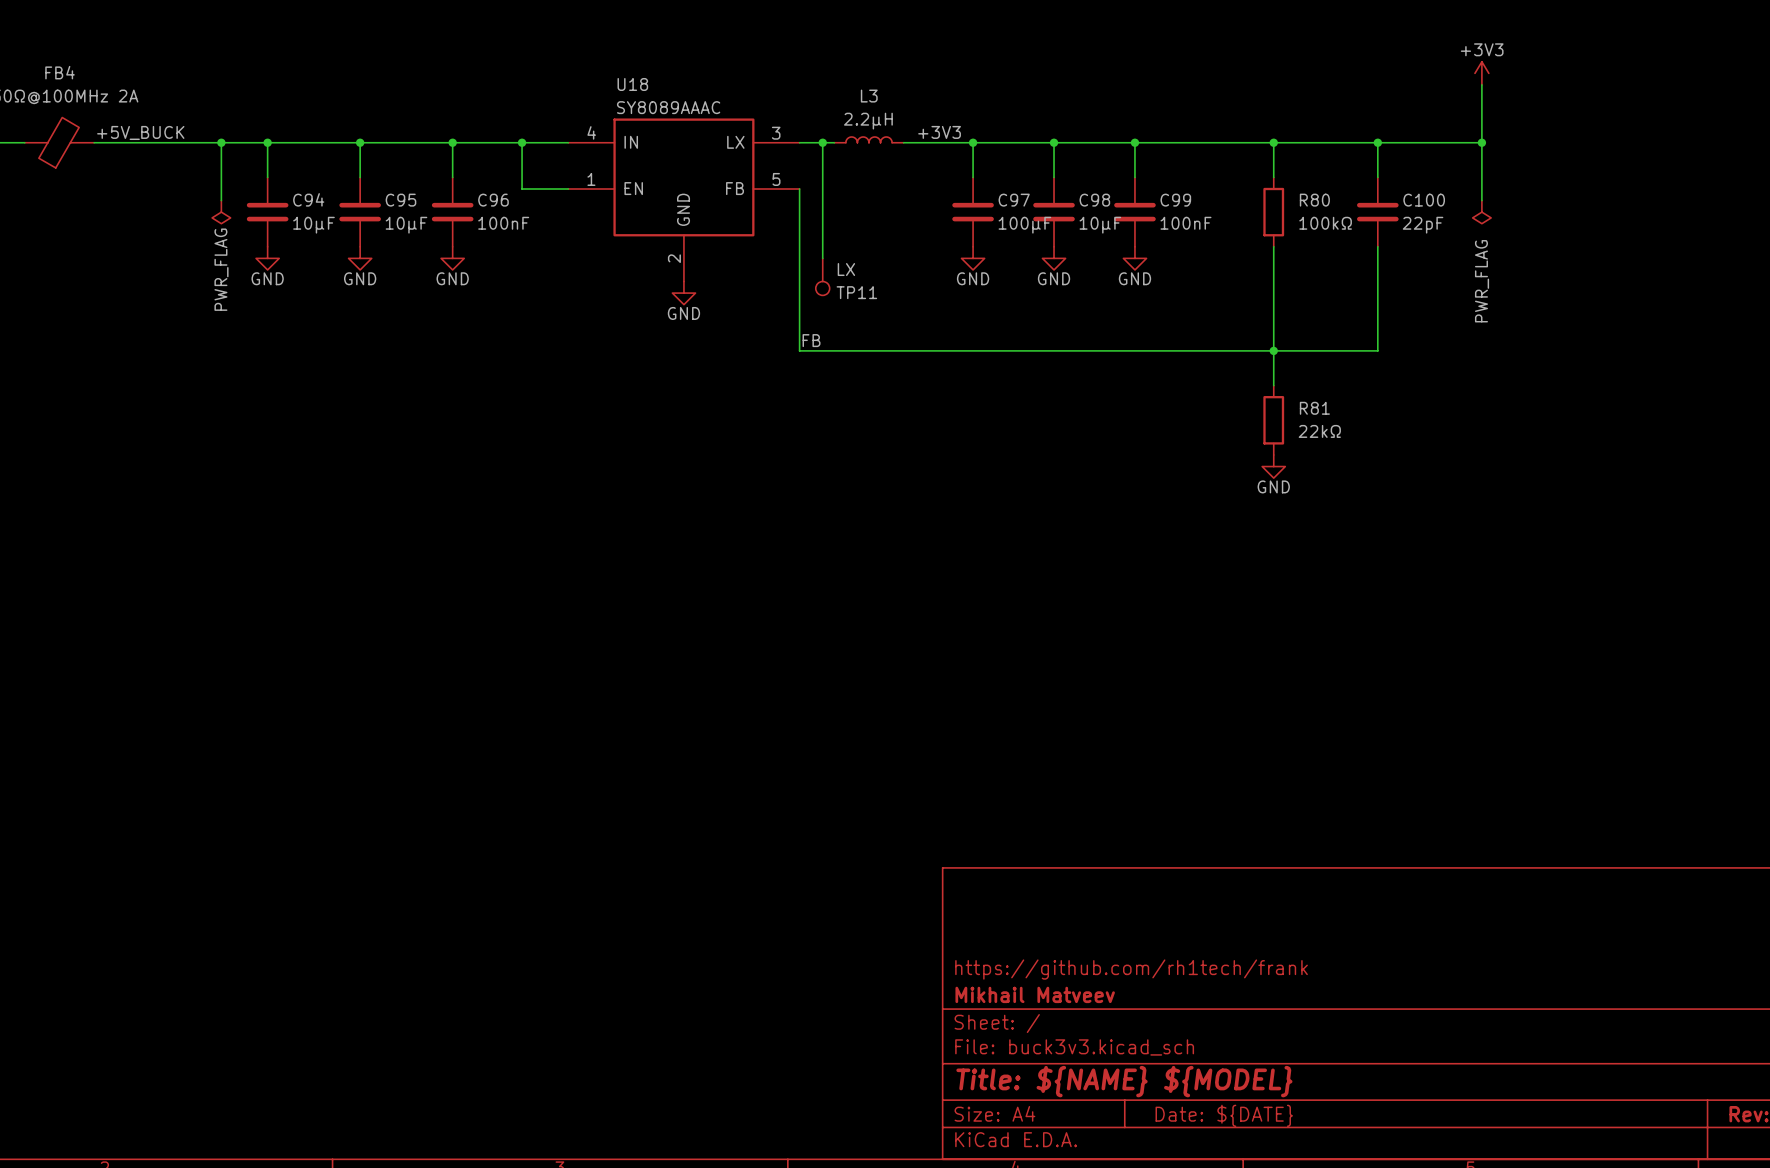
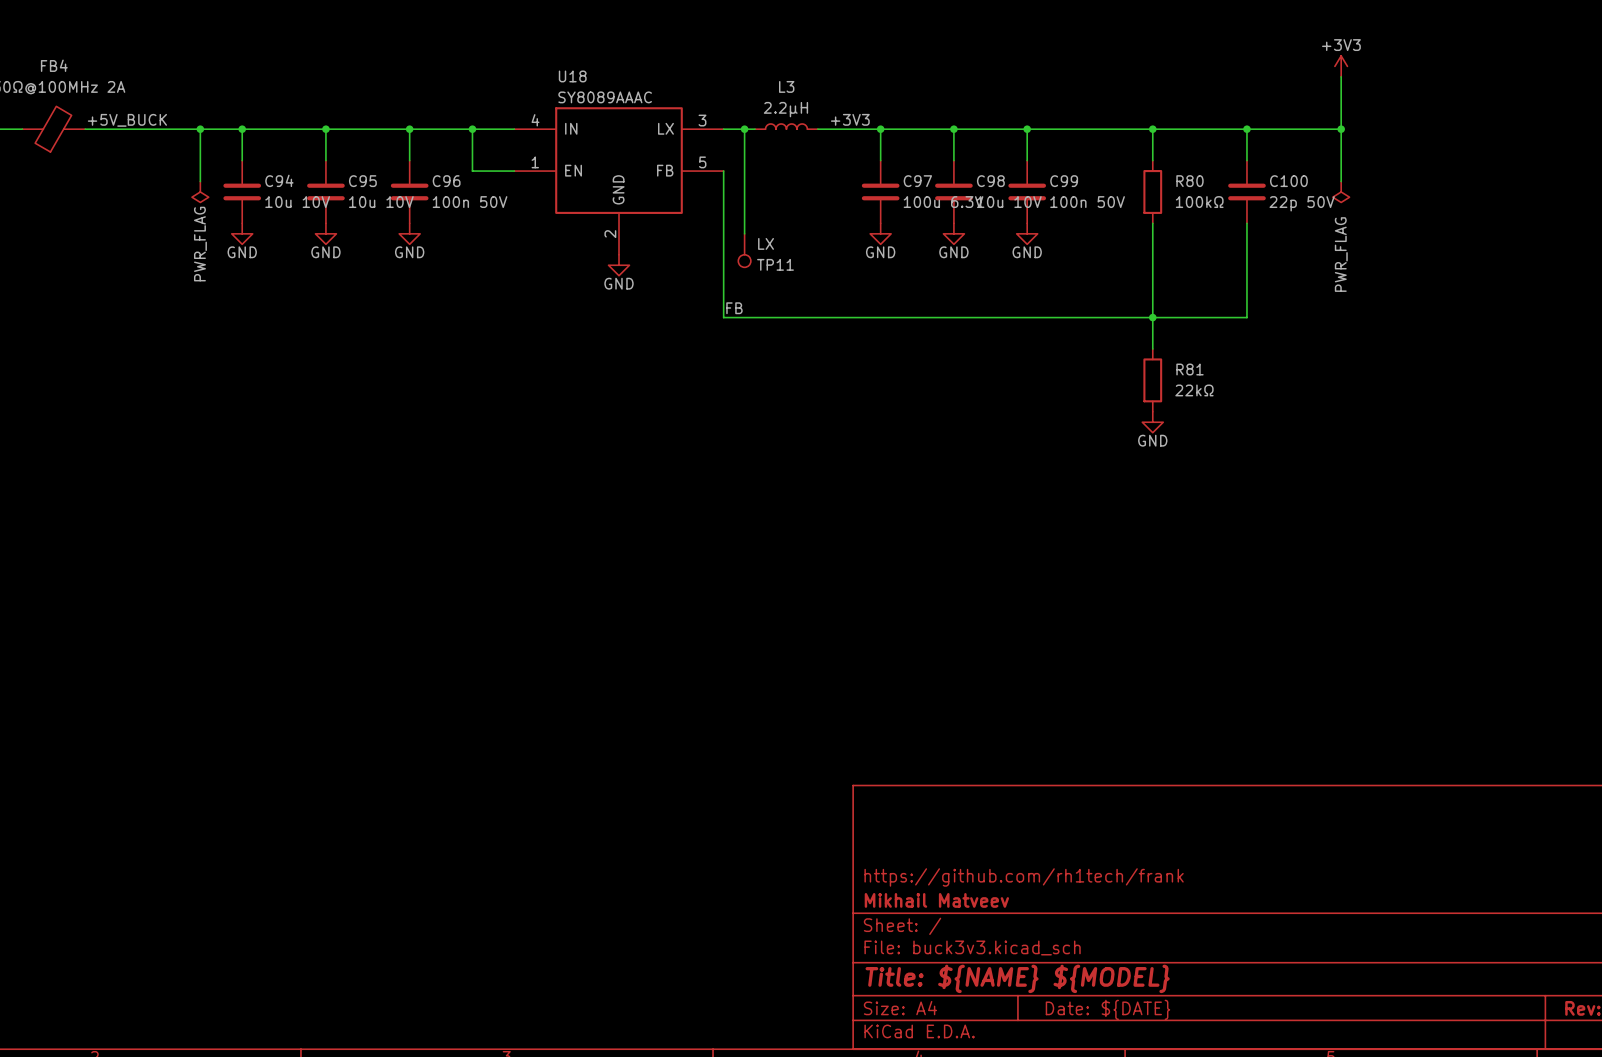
C96 value: 100nF (503, 223) -> 100n 50V (470, 202)
C99 value: 100nF (1185, 223) -> 100n 50V (1087, 202)
C94 value: 10µF (313, 225) -> 10u 10V (297, 202)
C95 value: 10µF (406, 225) -> 10u 10V (381, 202)
C97 value: 100µF (1024, 225) -> 100u 6.3V (943, 202)
C98 value: 10µF (1100, 225) -> 10u 10V (1009, 202)
C100 value: 22pF (1423, 225) -> 22p 50V (1302, 203)

